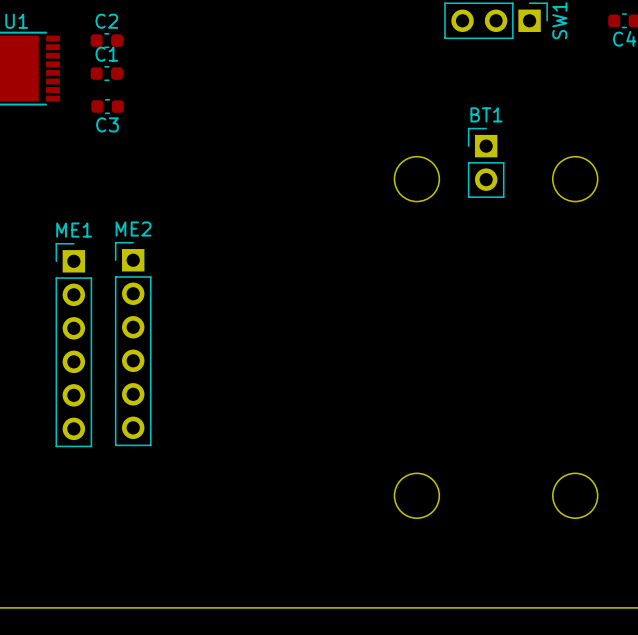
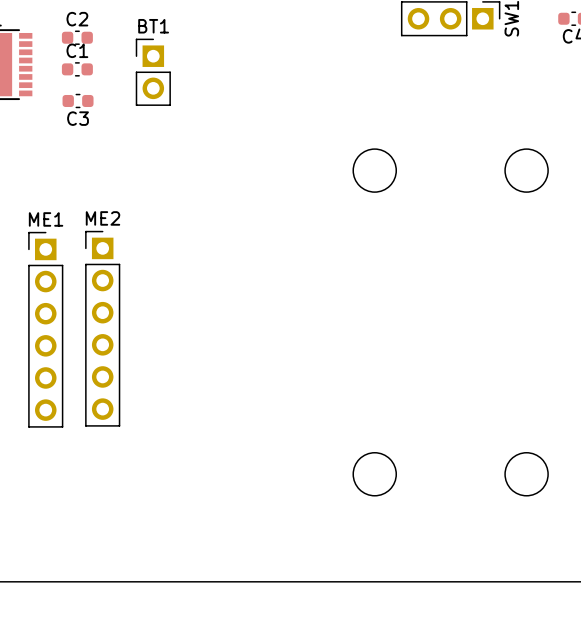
BT1 position: (486, 162) -> (153, 72)

